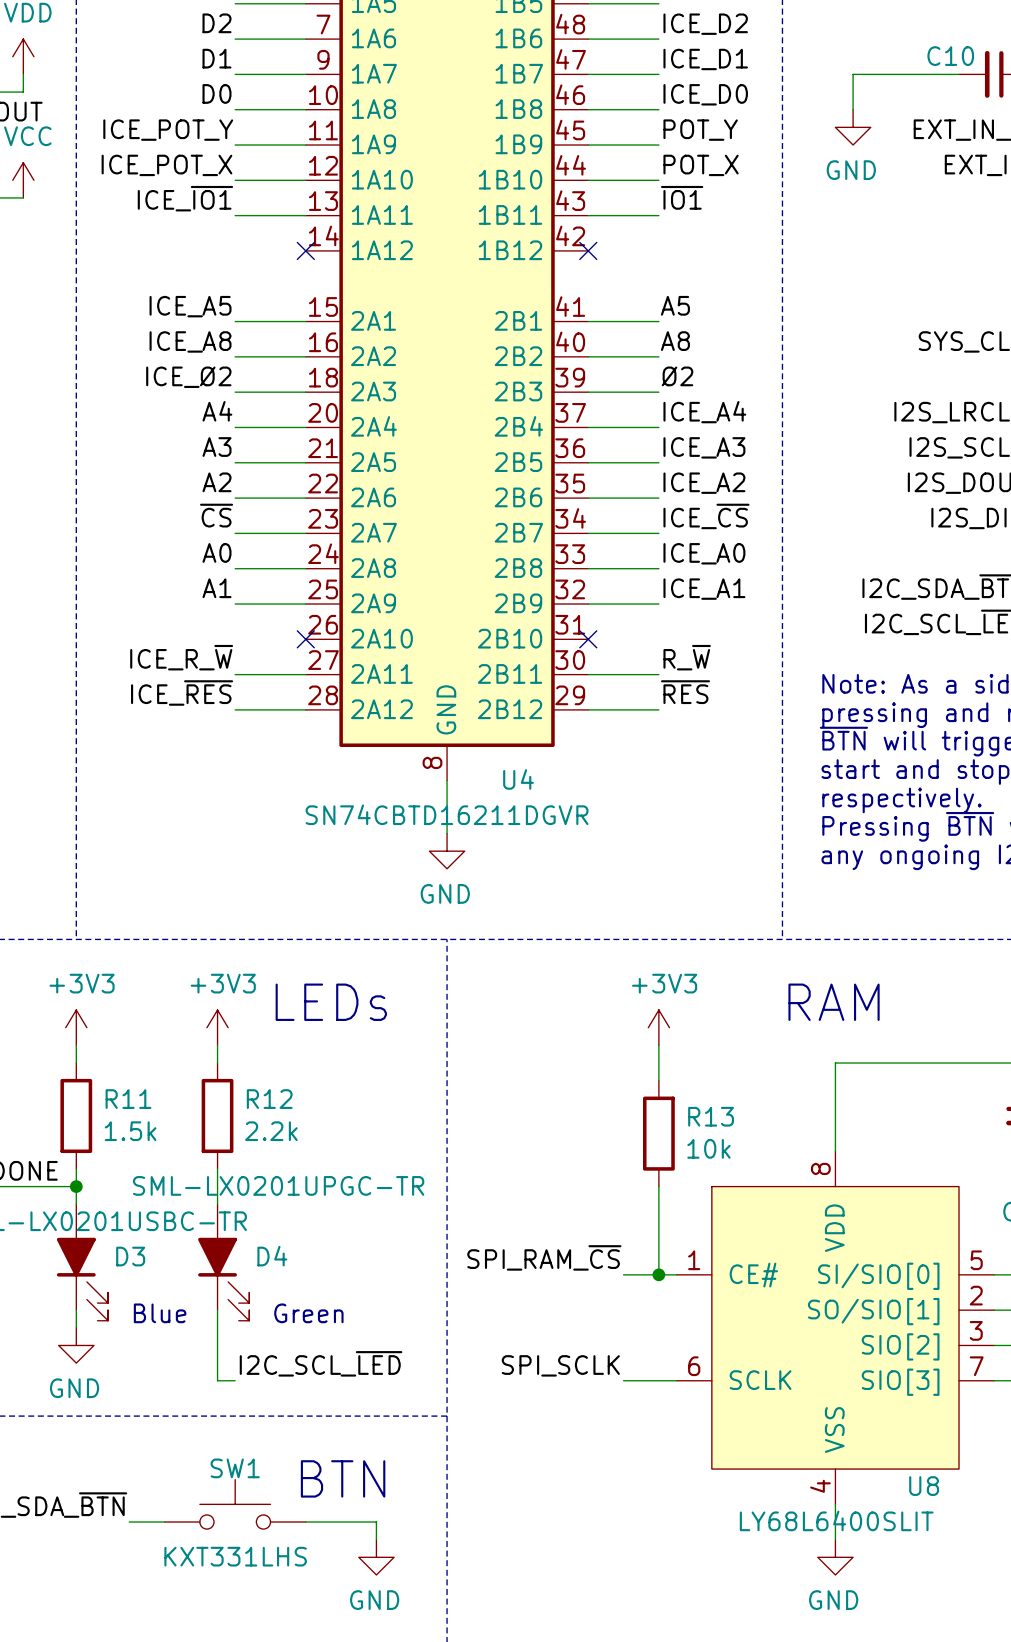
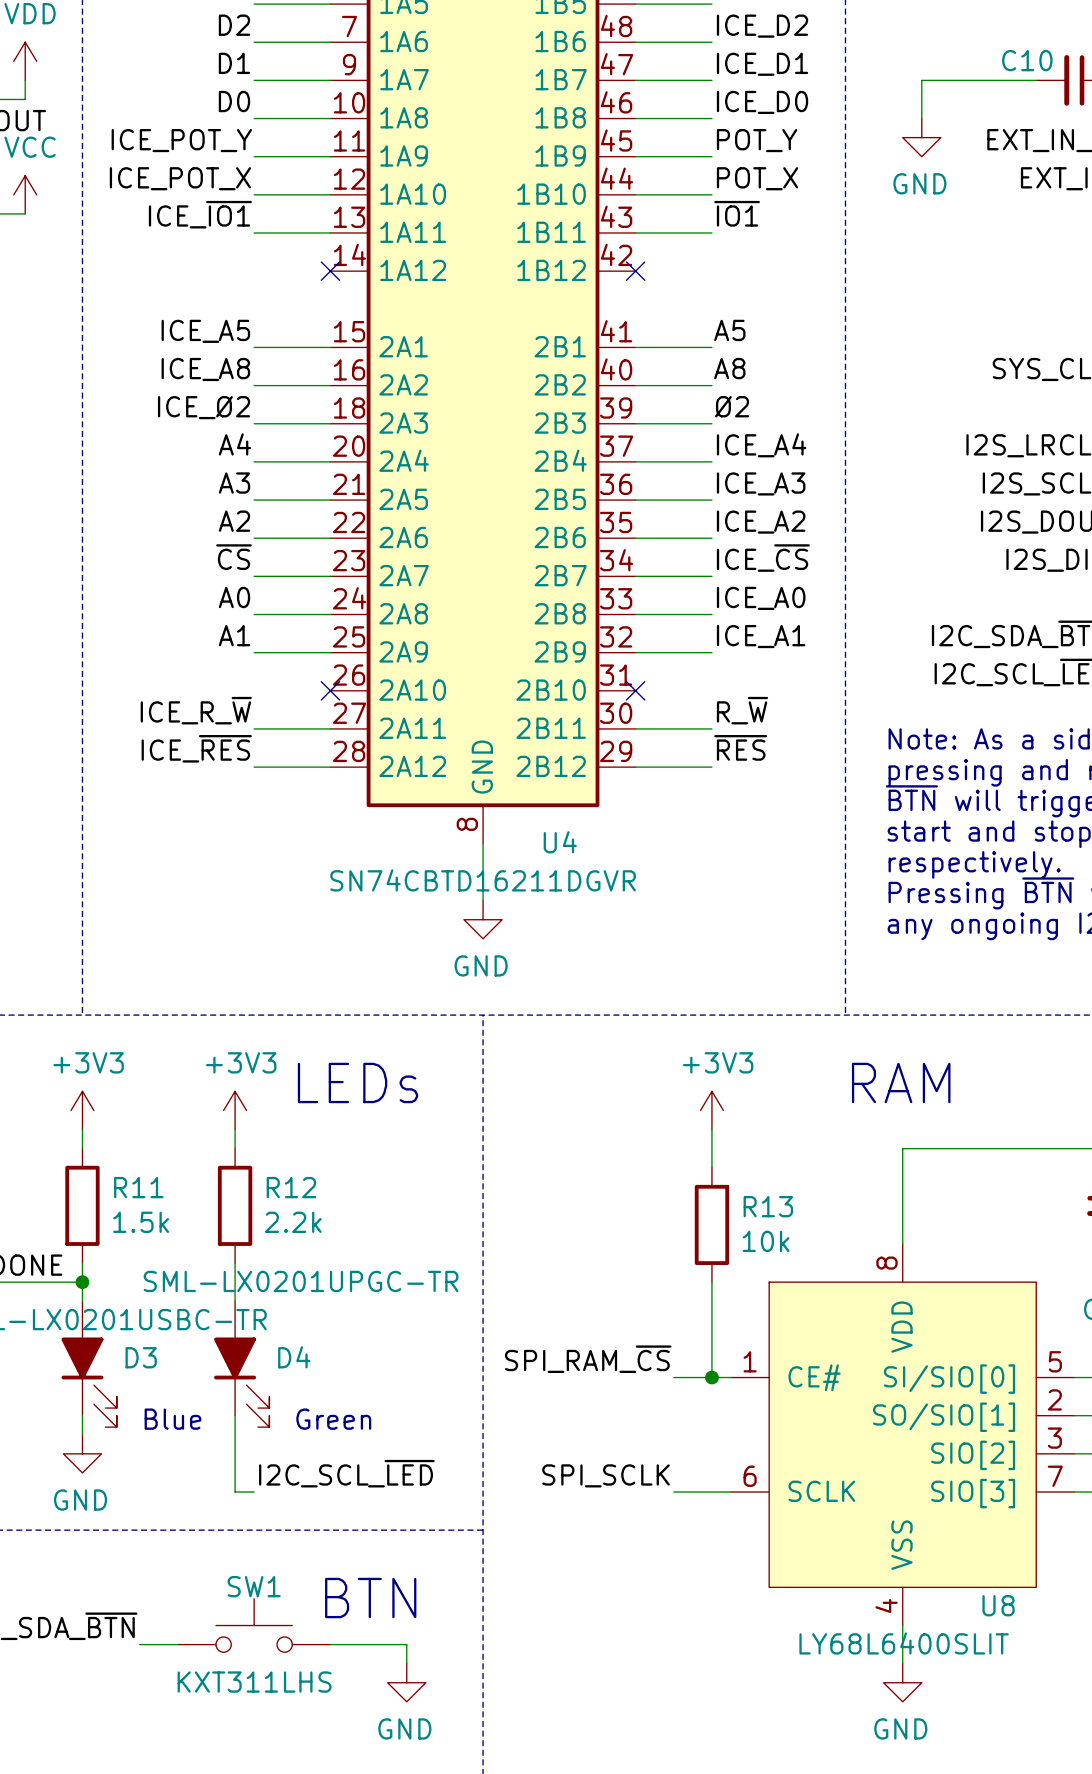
SW1 value: KXT331LHS (235, 1556) -> KXT311LHS (254, 1682)

